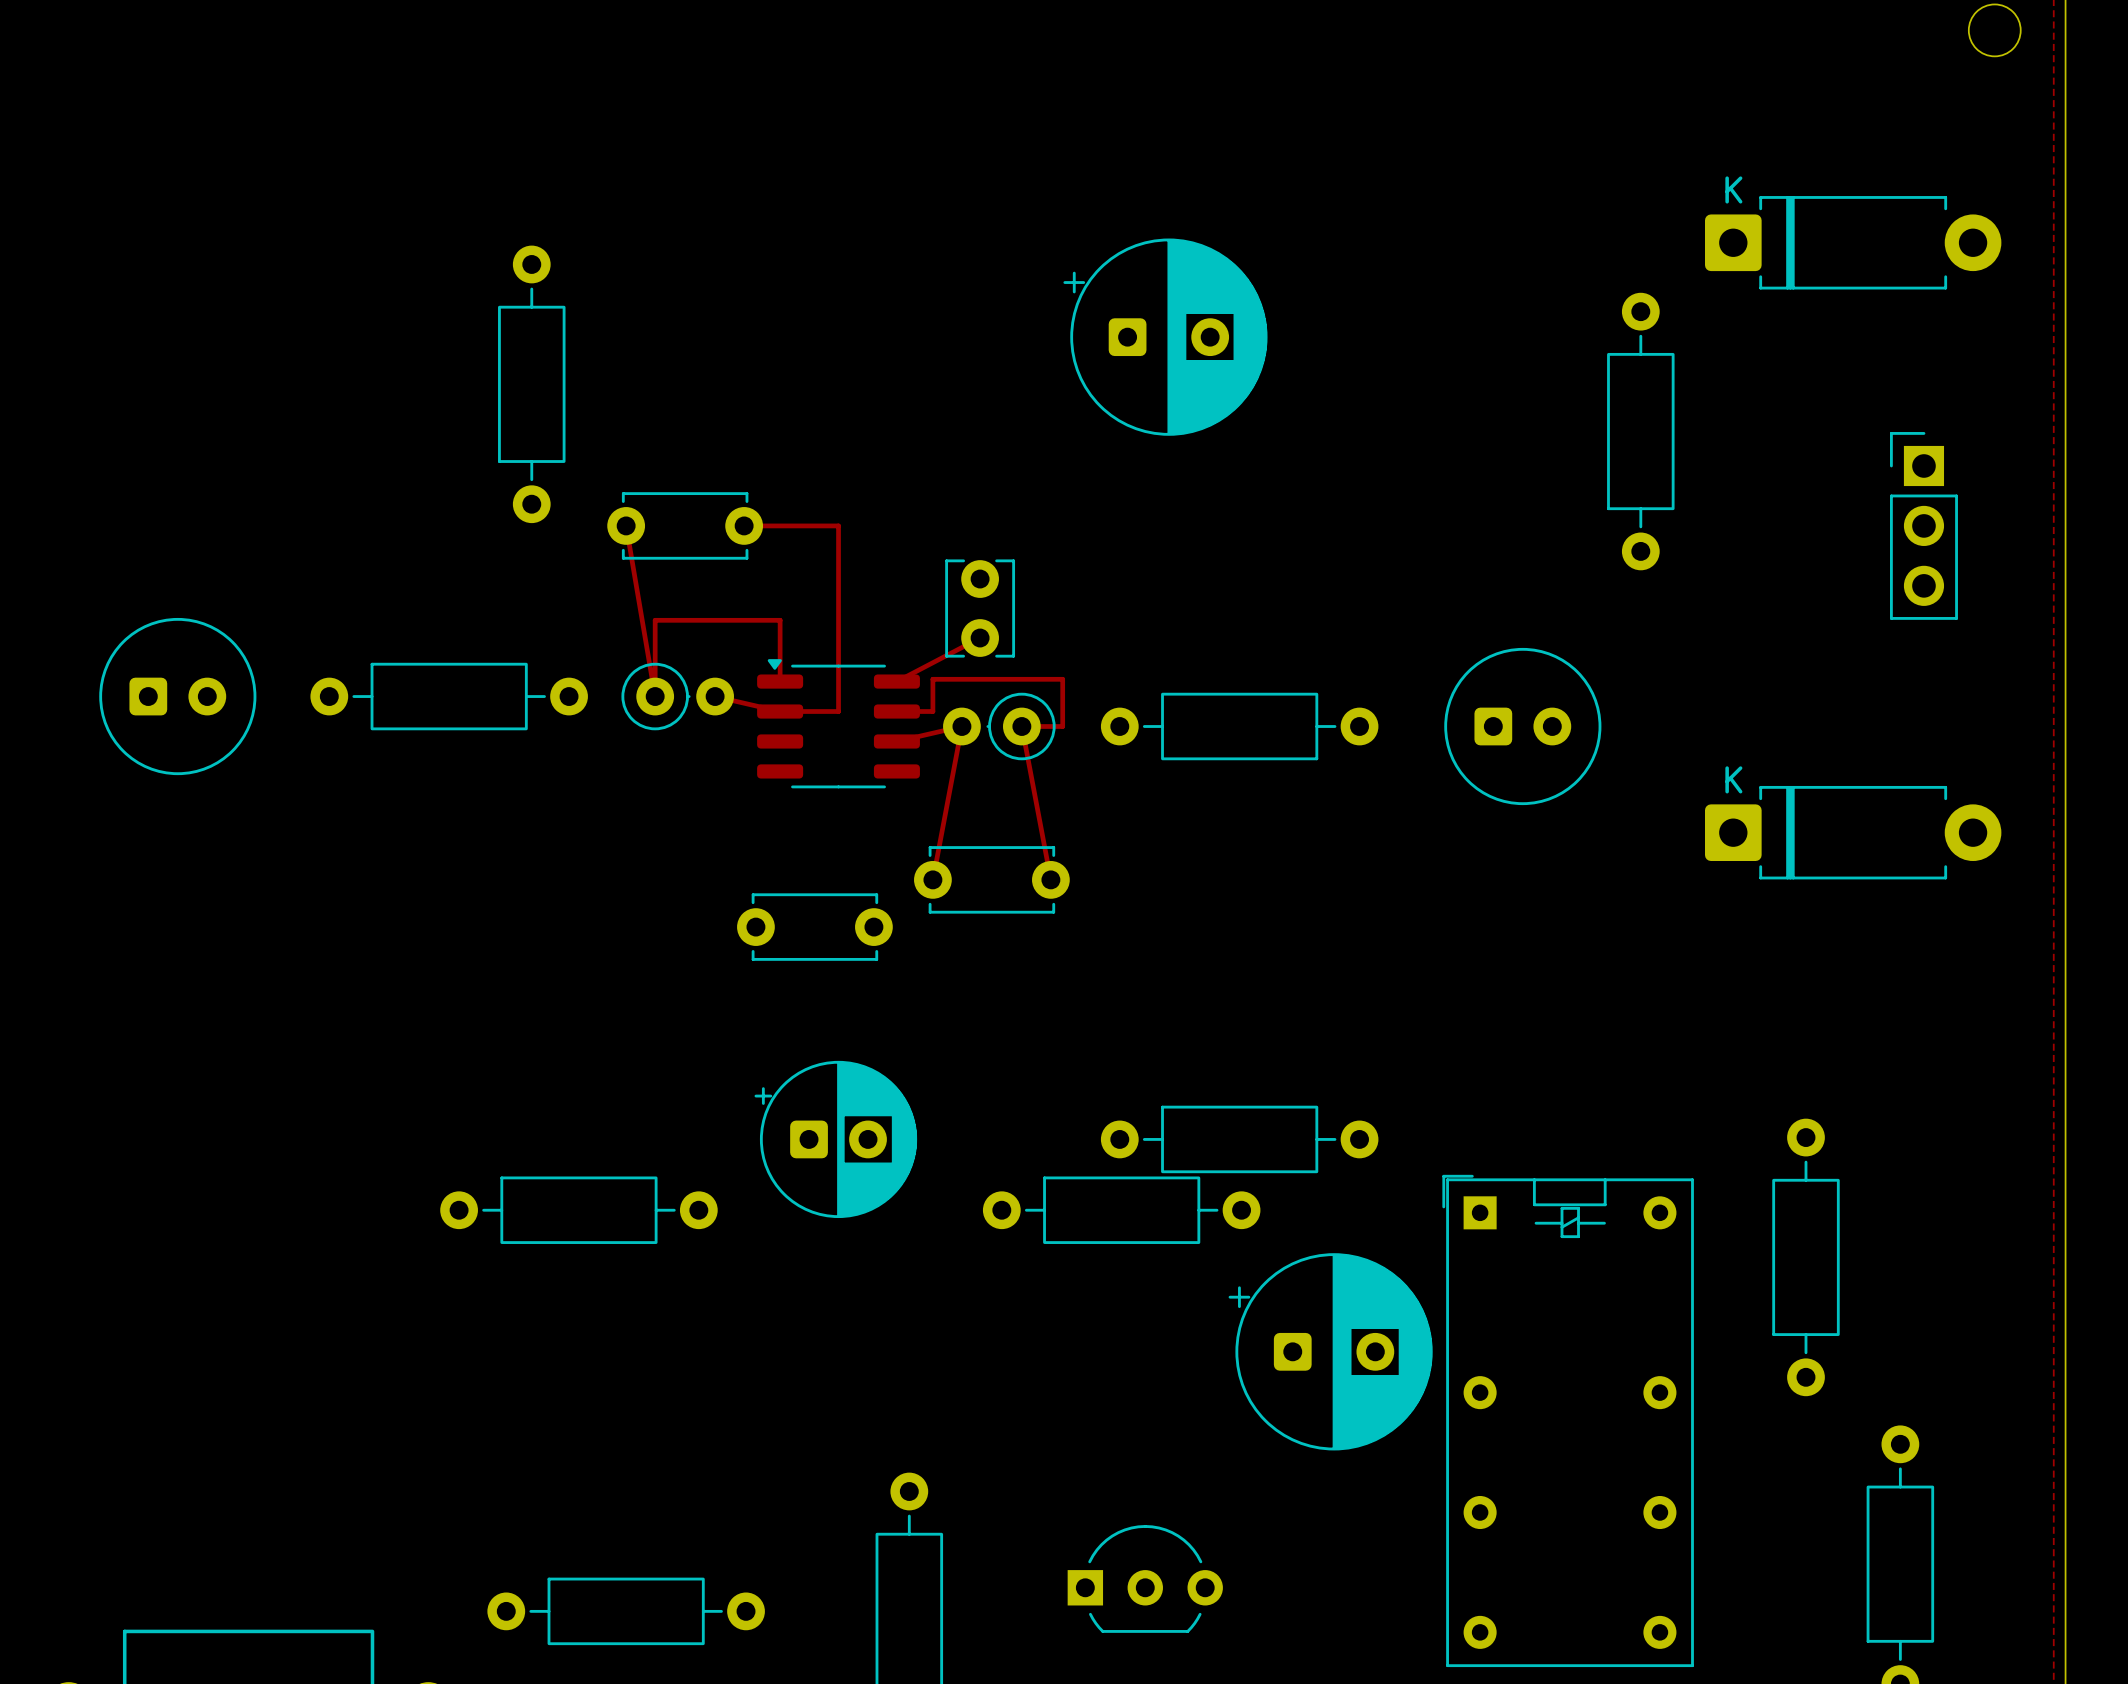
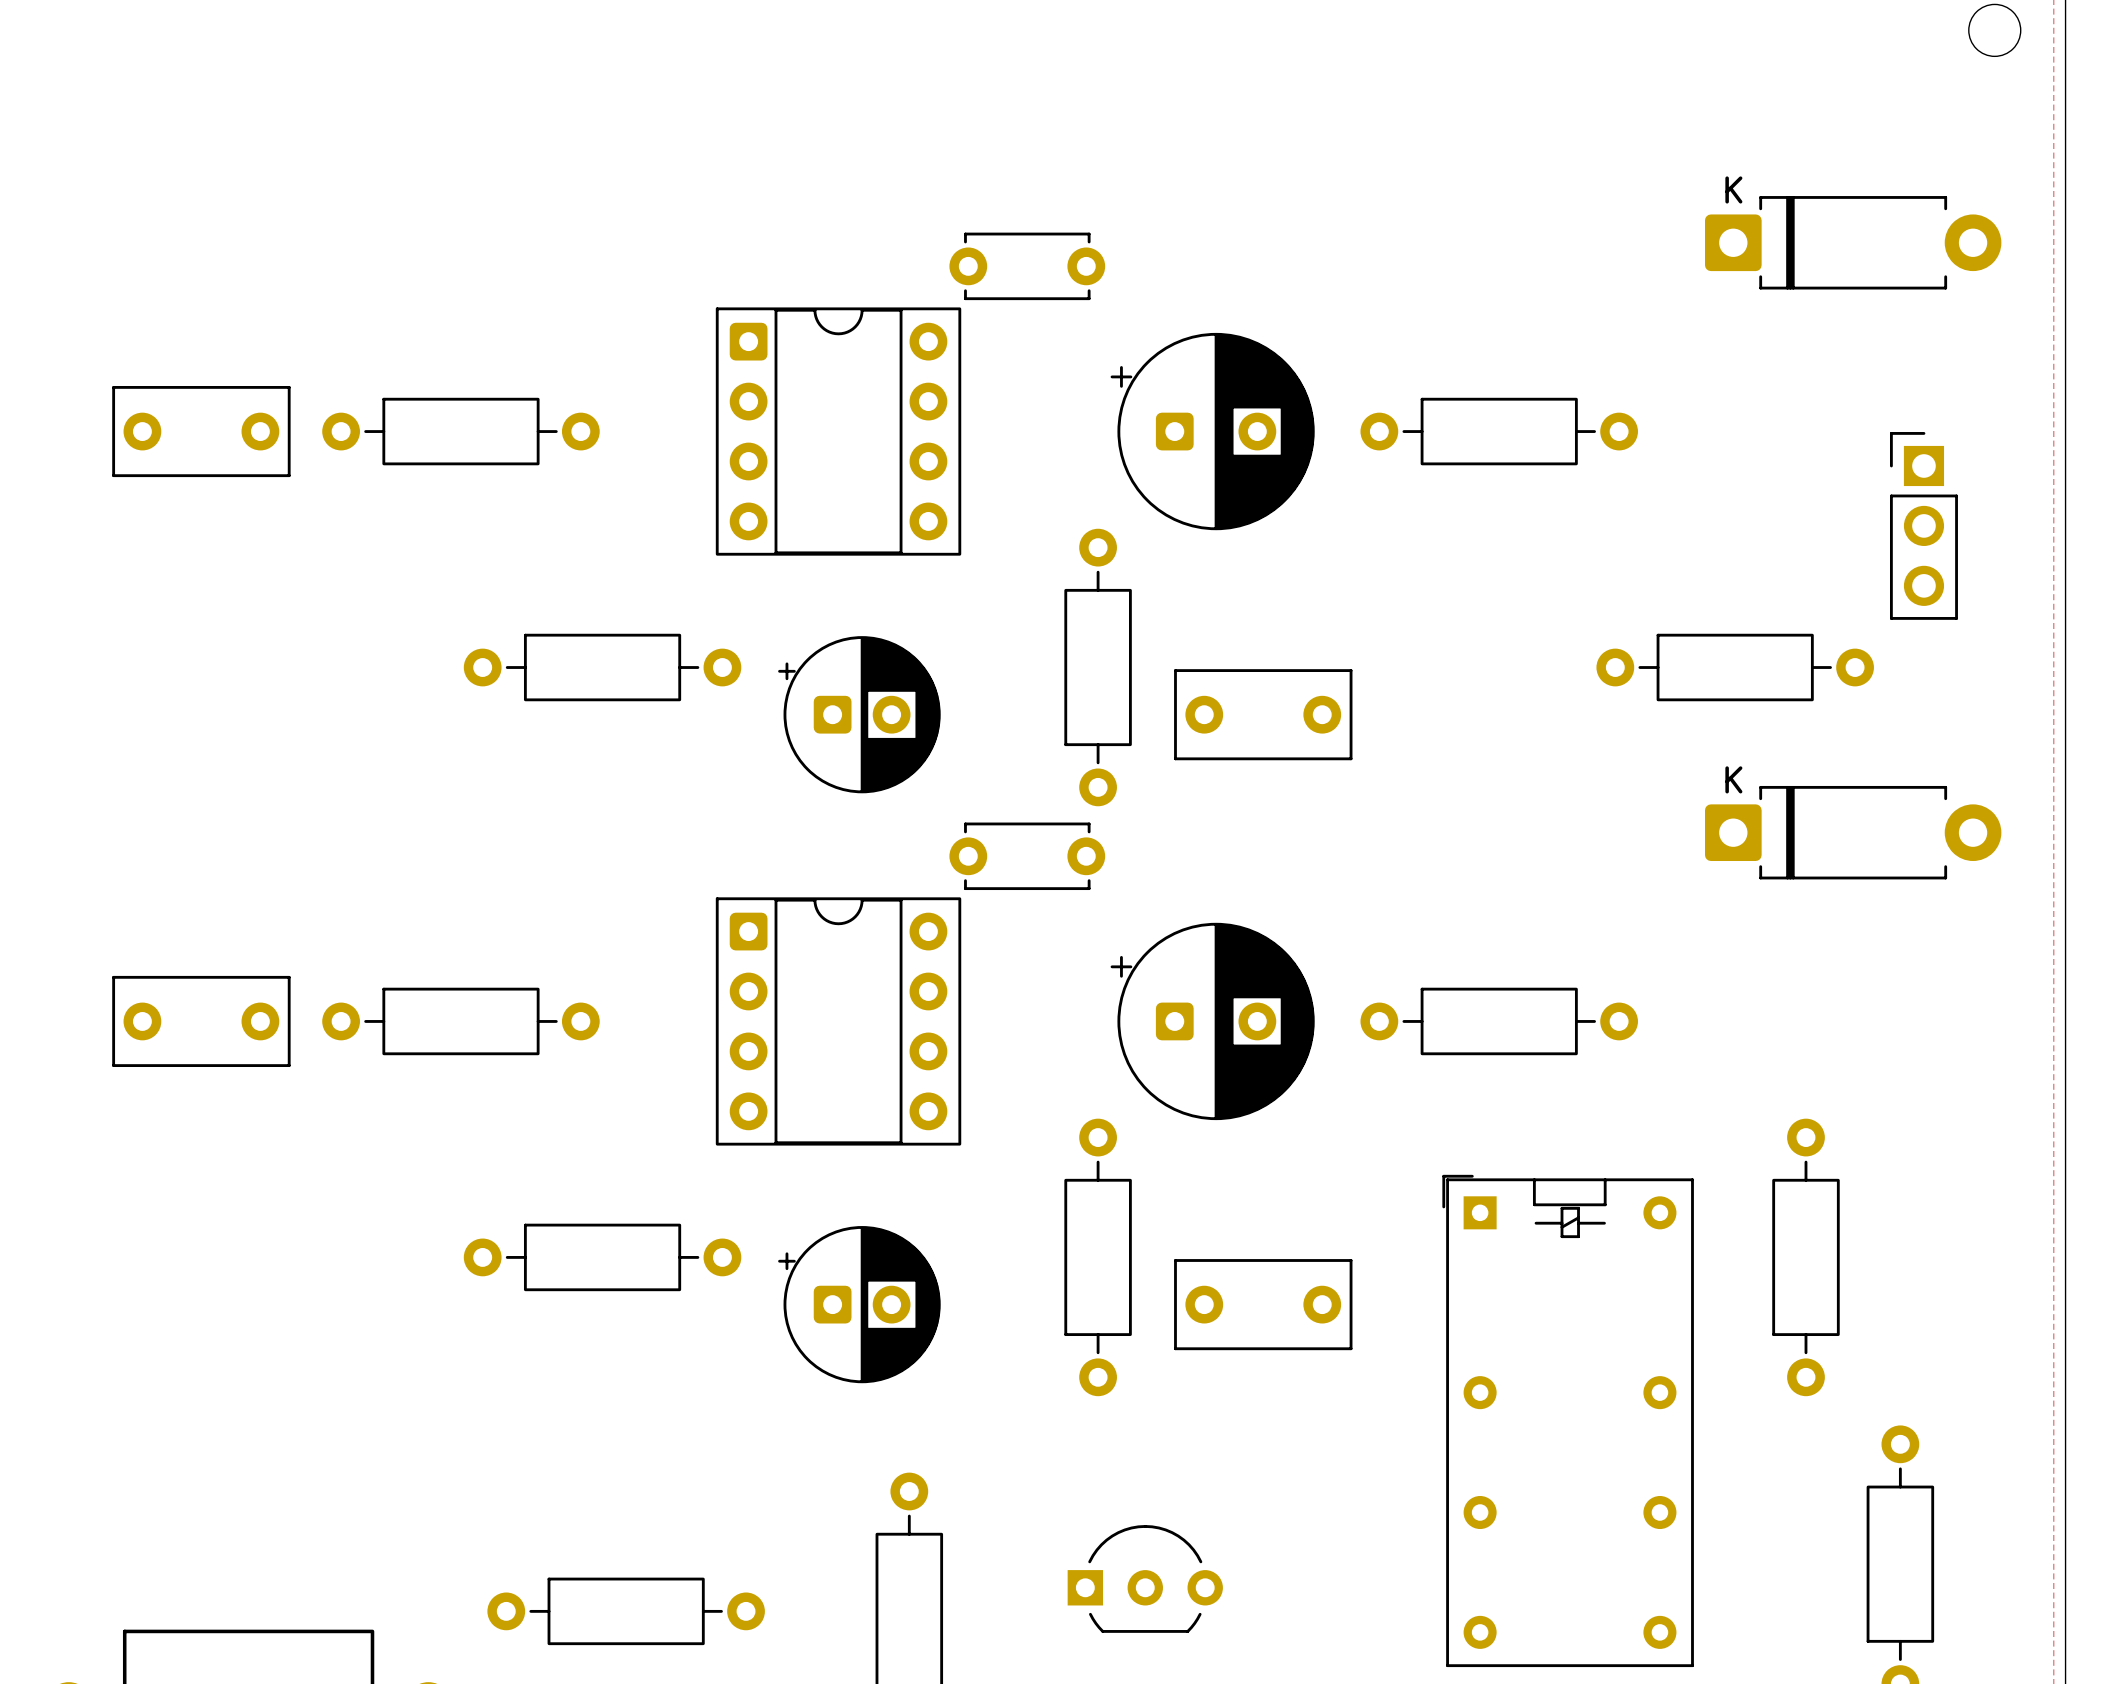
part: none -> (1027, 266)
part position: (1165, 337) -> (1212, 431)
part rotation: 0° (531, 384) -> 90° clockwise (460, 431)
part: none -> (201, 431)
part: none -> (838, 431)
part: none -> (1499, 431)
part: (1640, 431) -> none
track: (626, 525) (655, 696) (655, 620) (780, 620) (780, 681) -> none
part: (685, 525) -> none
track: (744, 525) (838, 525) (838, 711) (780, 711) (715, 696) -> none
part: (980, 608) -> none
track: (980, 638) (896, 681) -> none
part footprint: [757, 659, 920, 789] -> [778, 636, 941, 794]
part: none -> (602, 667)
part: none -> (1735, 667)
part: (177, 696) -> none
part: (449, 696) -> none
part: (677, 696) -> none
track: (896, 711) (932, 711) (932, 679) (1062, 679) (1062, 726) (1021, 726) (1050, 879) -> none
part: none -> (1263, 714)
part: (999, 726) -> none
part rotation: 0° (1239, 726) -> 90° clockwise (1098, 667)
part: (1522, 726) -> none
track: (896, 741) (961, 726) (932, 879) -> none
part position: (991, 879) -> (1027, 856)
part: (814, 927) -> none
part: none -> (201, 1021)
part: none -> (460, 1021)
part: none -> (838, 1021)
part: none -> (1212, 1021)
part: none -> (1499, 1021)
part position: (835, 1139) -> (859, 1304)
part: (1239, 1139) -> none
part position: (578, 1210) -> (602, 1257)
part rotation: 0° (1121, 1210) -> 90° clockwise (1098, 1257)
part: none -> (1263, 1304)
part: (1330, 1351) -> none

